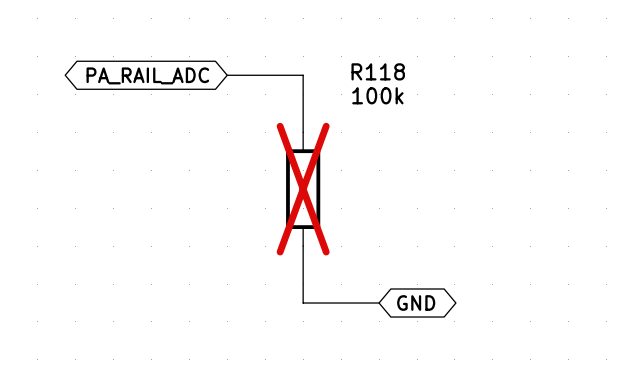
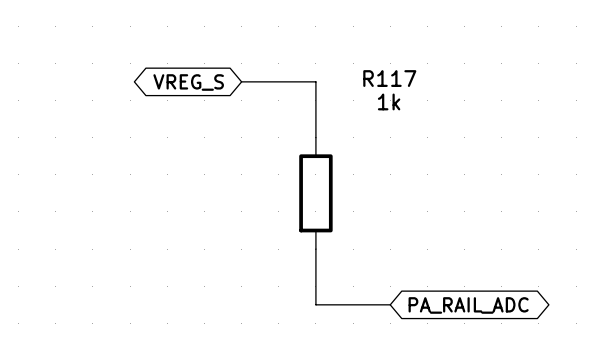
R118 name: R118 (378, 71) -> R117 (389, 78)
global label: PA_RAIL_ADC (147, 75) -> VREG_S (188, 82)
R118 value: 100k (377, 95) -> 1k (389, 101)
R118 do-not-place cross: (303, 189) -> none
global label: GND (416, 303) -> PA_RAIL_ADC (468, 305)

